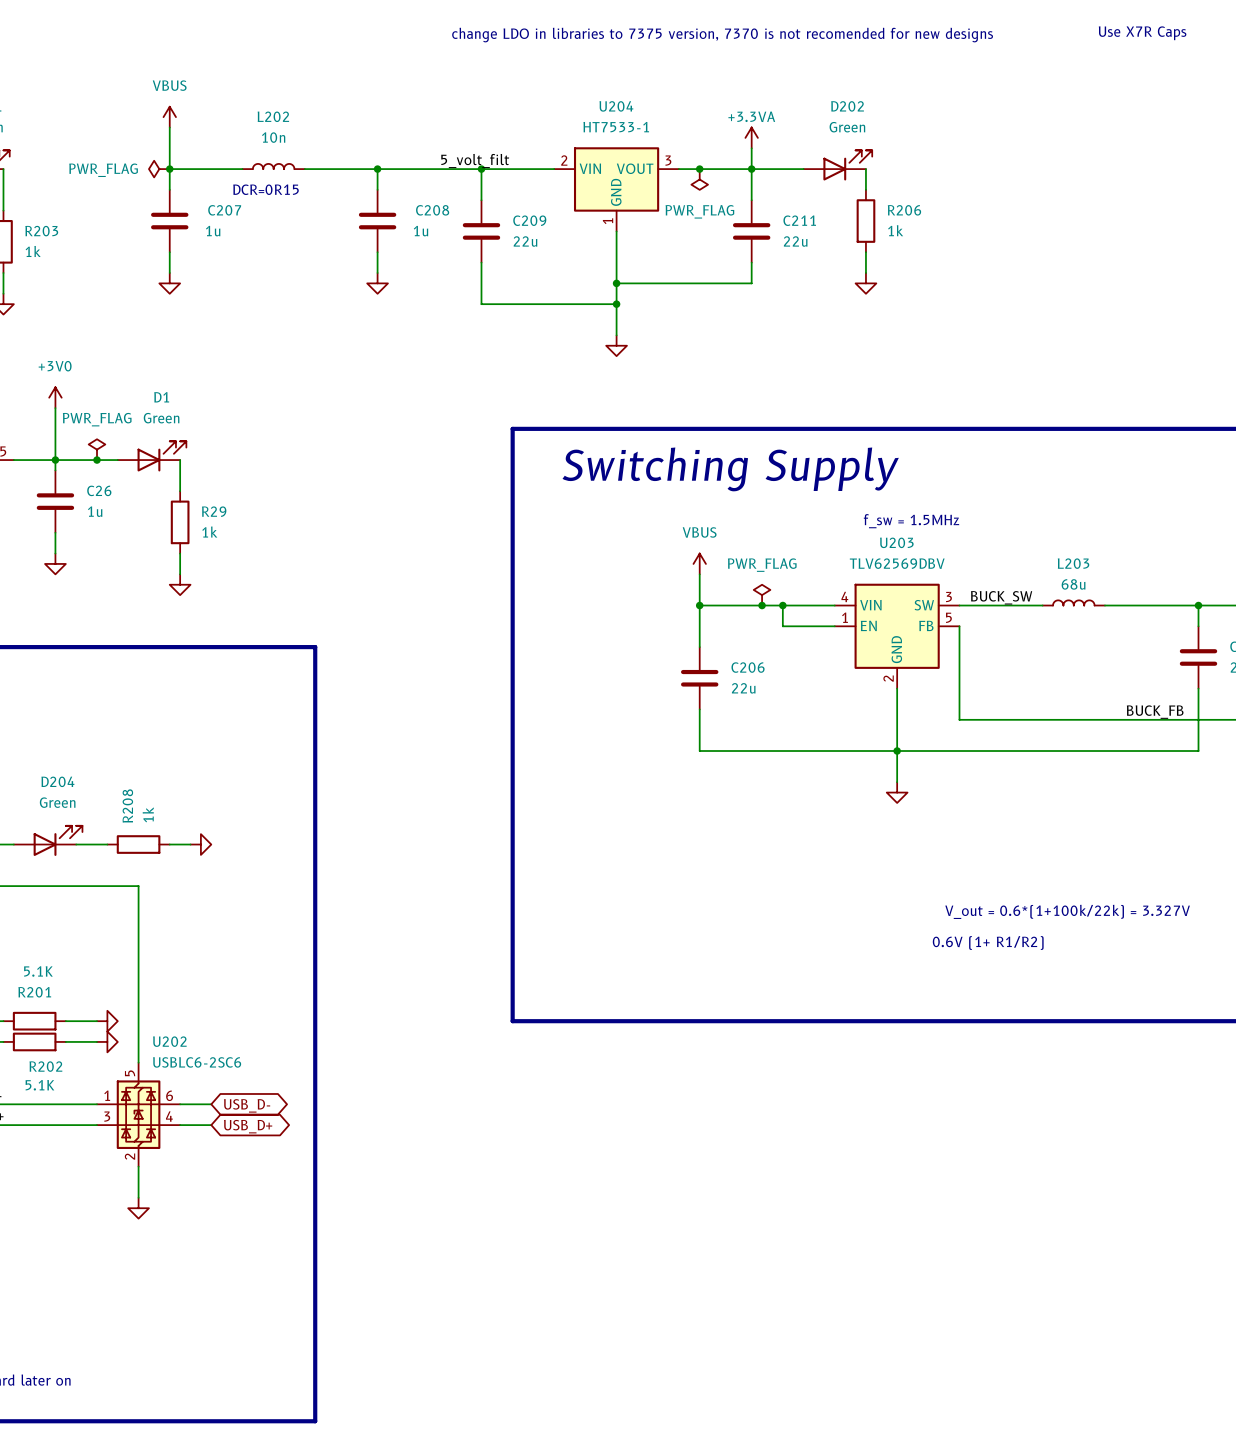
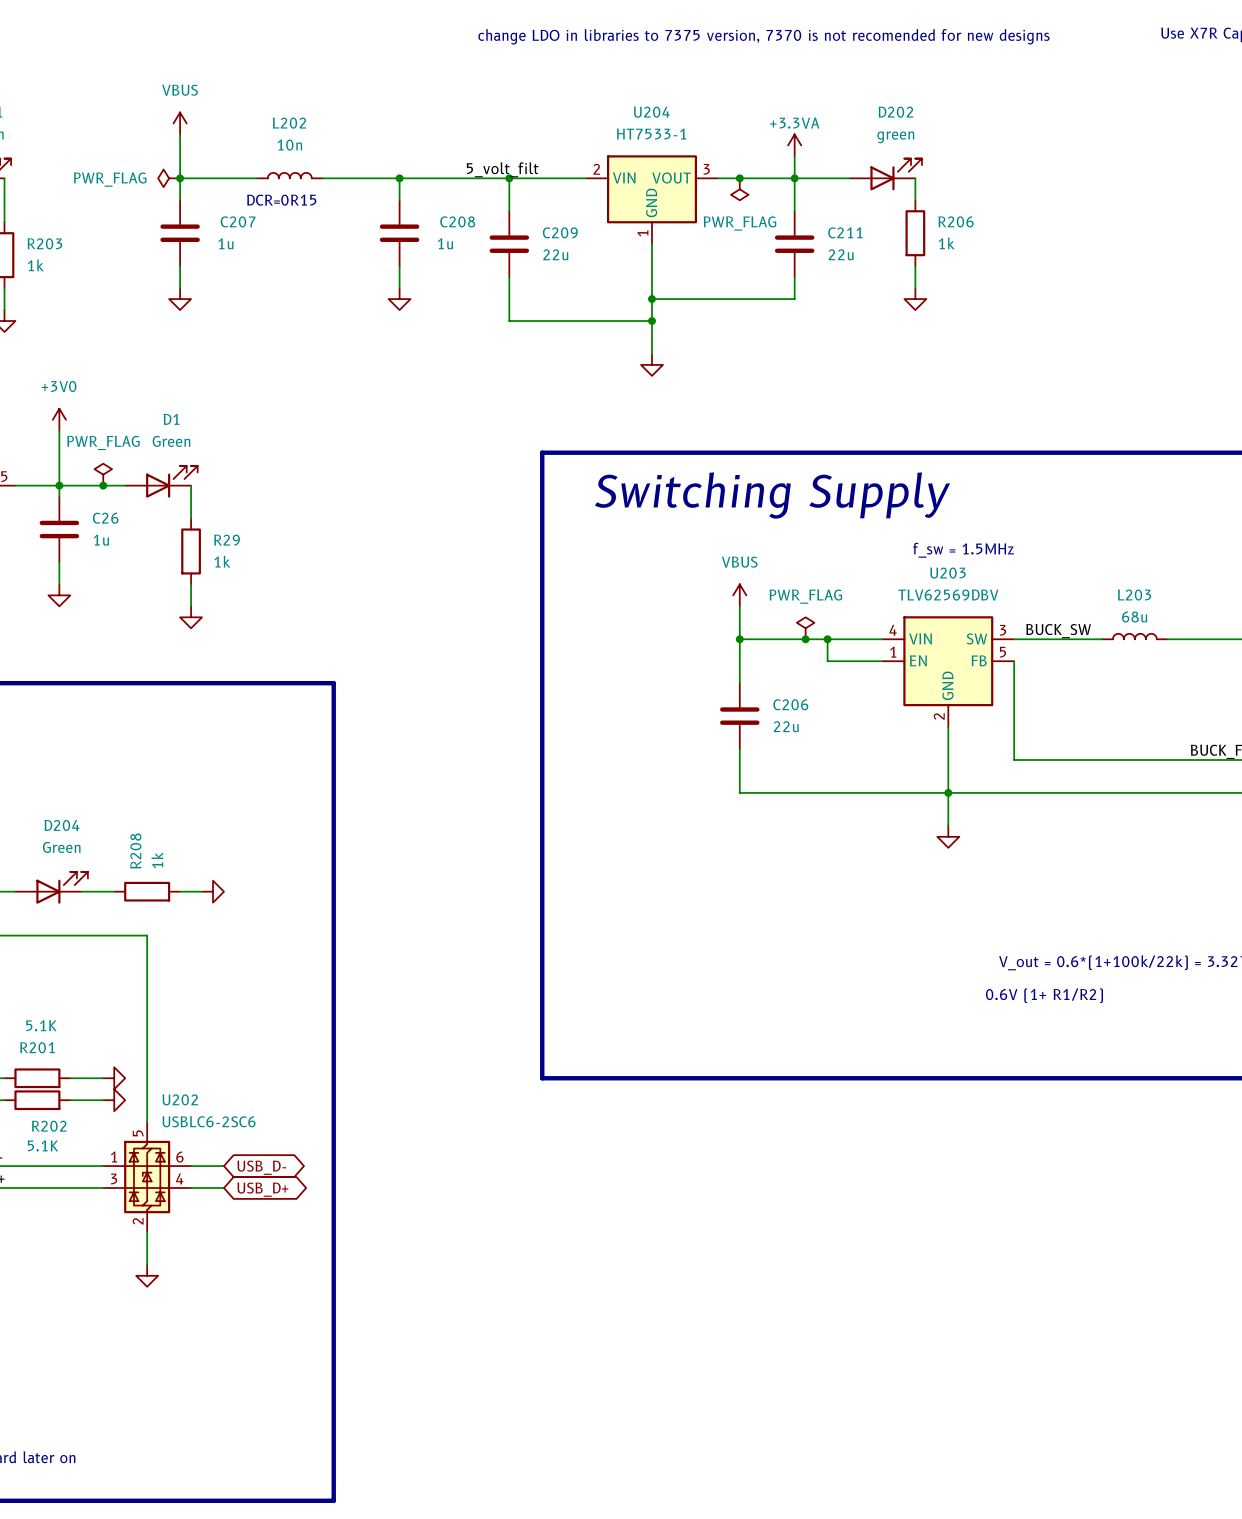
D202 value: Green (847, 127) -> green (895, 137)

